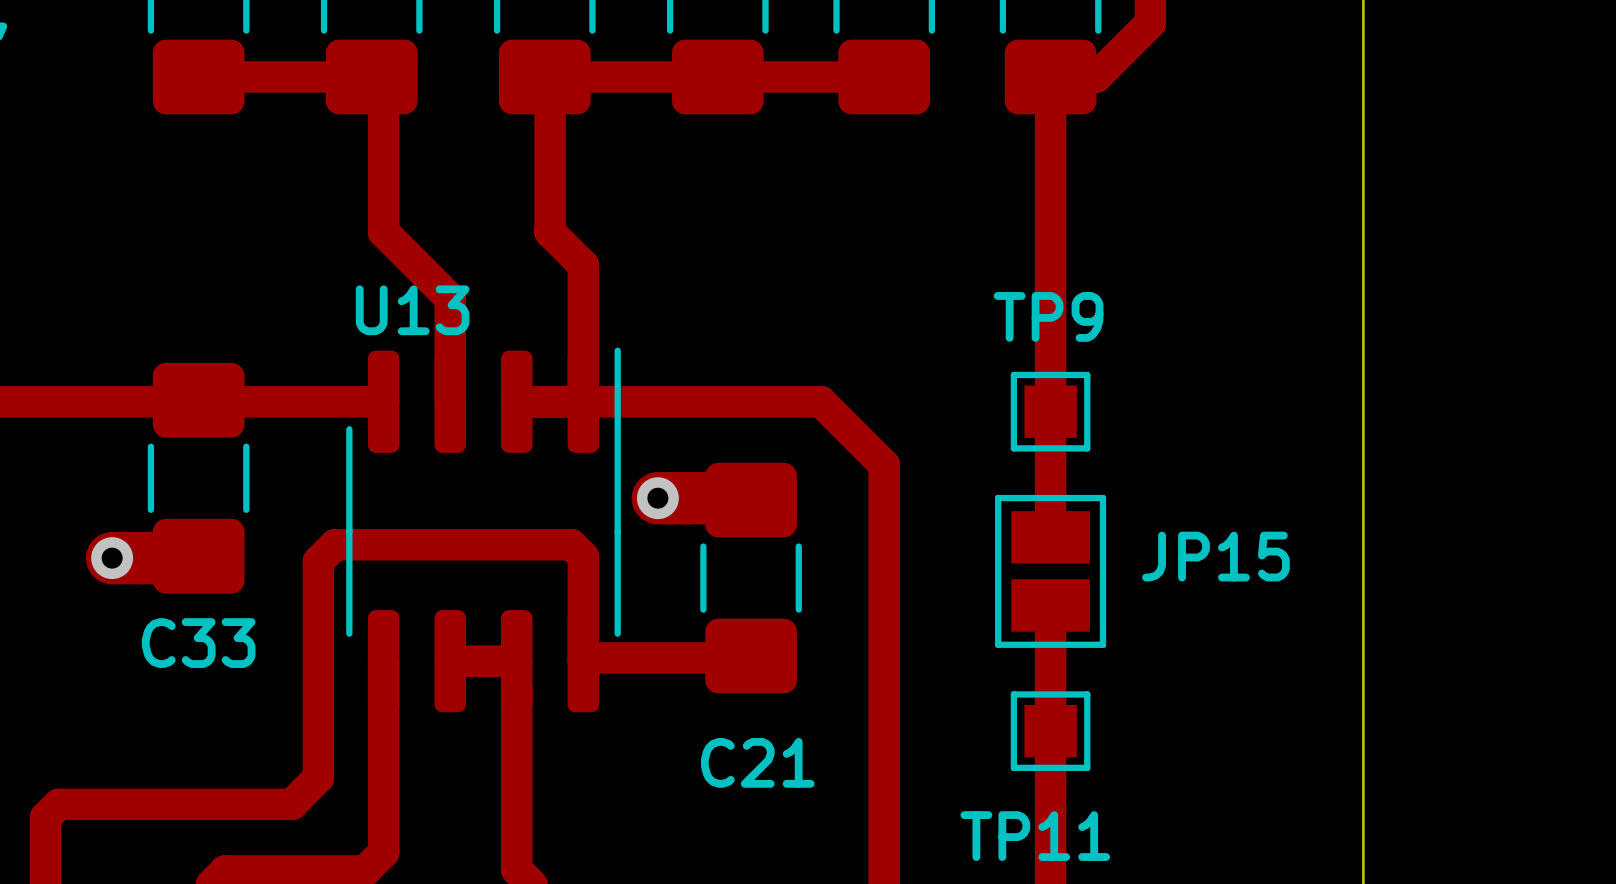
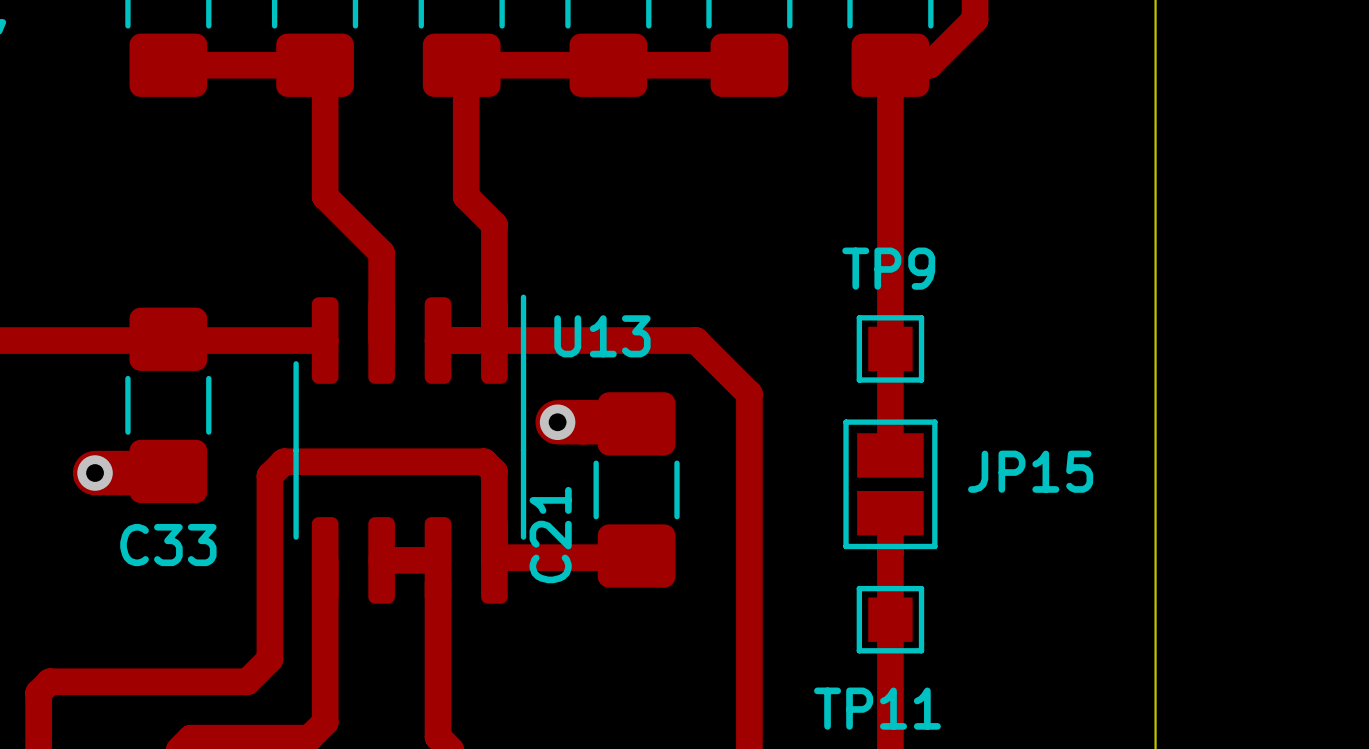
U13 name position: U13 (412, 310) -> U13 (602, 336)
C21 name rotation: 0° (757, 762) -> 90° counterclockwise (550, 535)
C21 name position: C21 (757, 762) -> C21 (550, 535)

